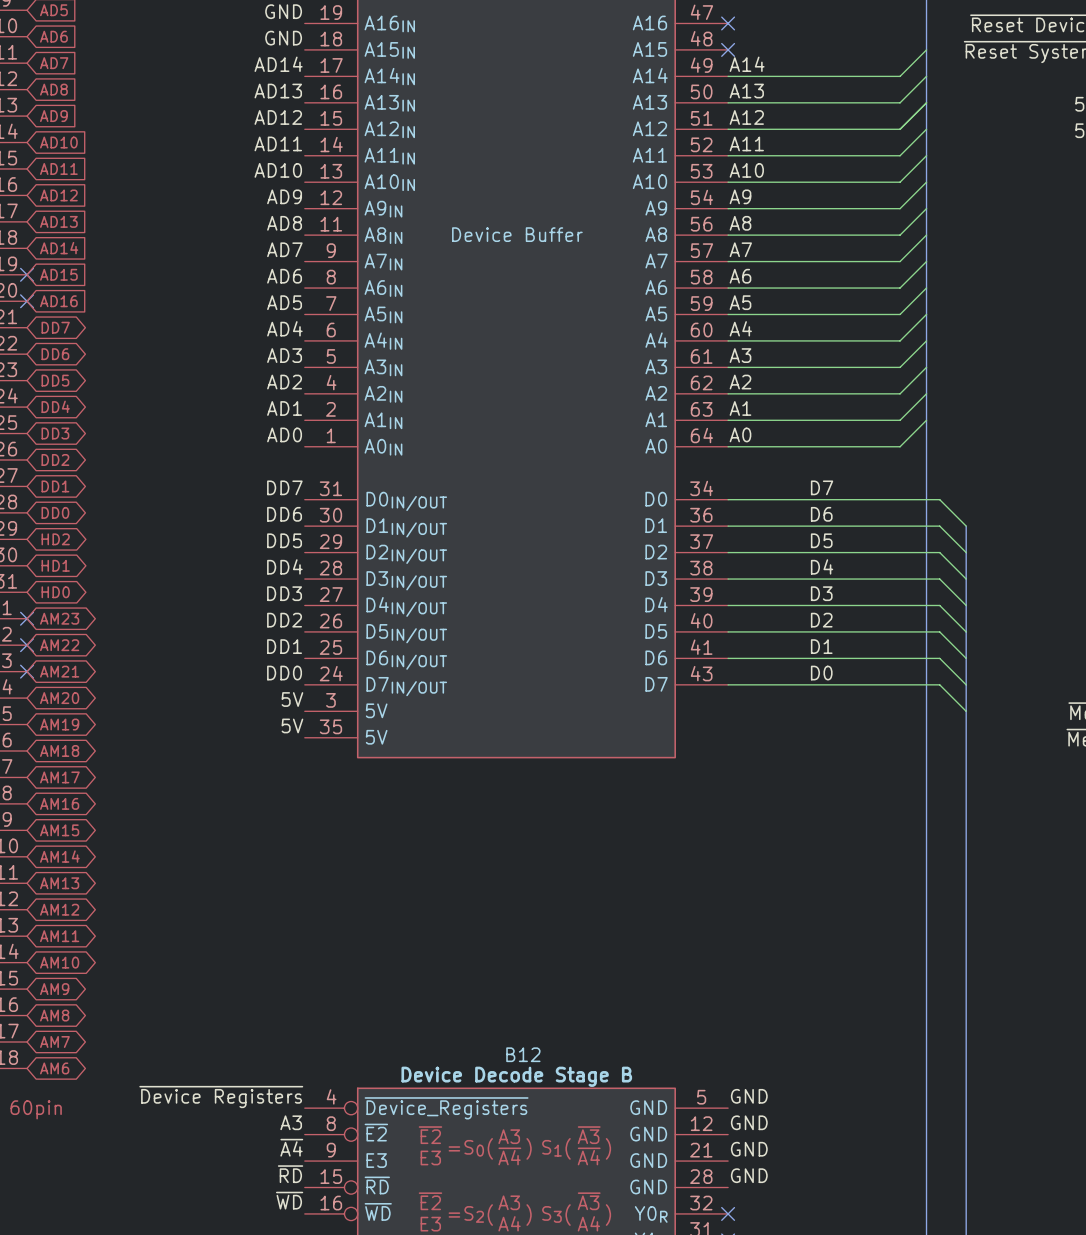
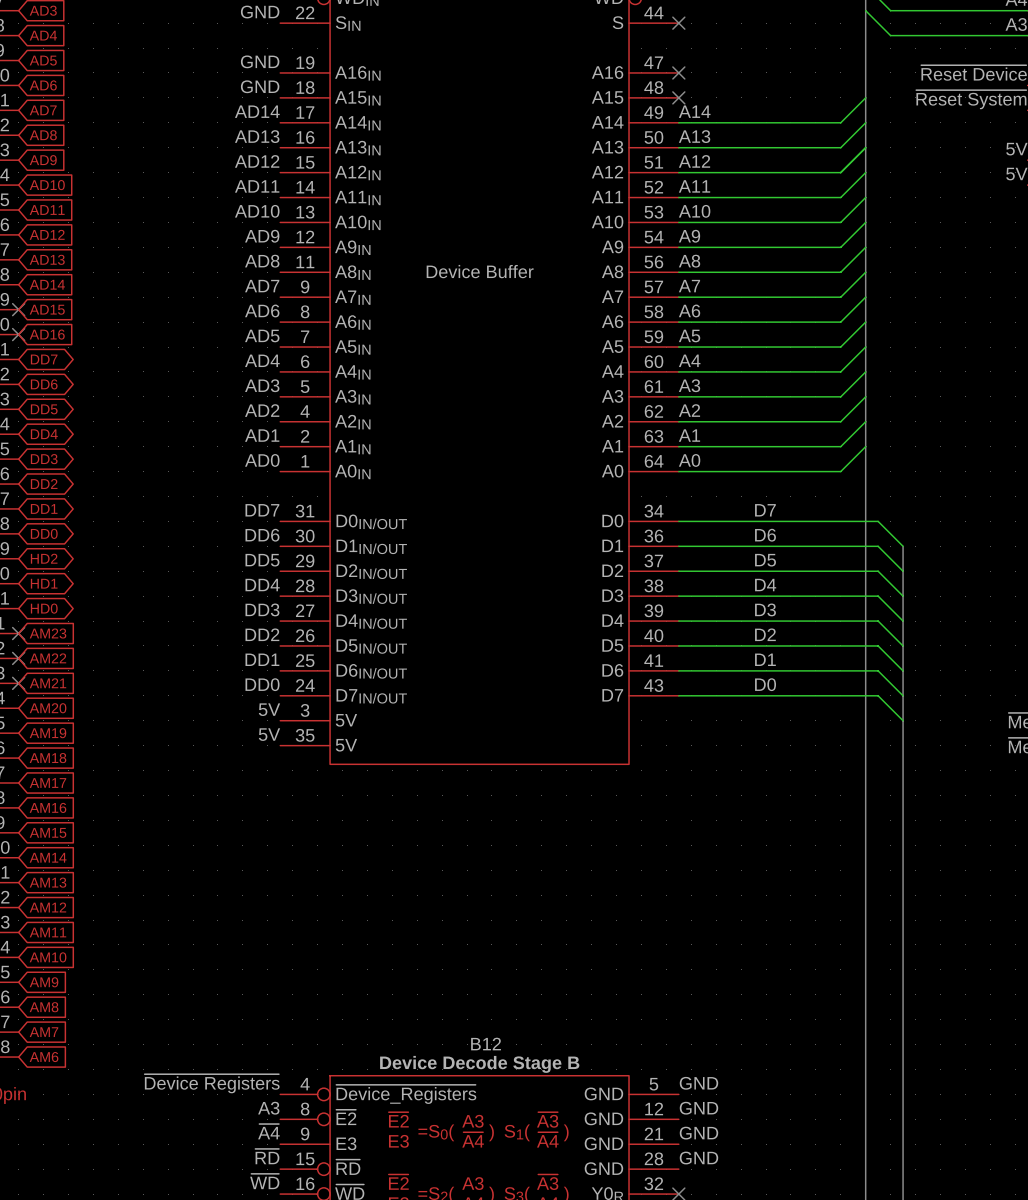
global label shape: bidirectional (59, 618) -> input (48, 633)
global label shape: bidirectional (59, 645) -> input (47, 658)
global label shape: bidirectional (59, 671) -> input (47, 683)
global label shape: bidirectional (59, 698) -> input (48, 708)
global label shape: bidirectional (59, 724) -> input (47, 733)
global label shape: bidirectional (59, 750) -> input (48, 758)
global label shape: bidirectional (59, 777) -> input (47, 783)
global label shape: bidirectional (59, 803) -> input (48, 807)
global label shape: bidirectional (59, 830) -> input (48, 832)
global label shape: bidirectional (59, 856) -> input (48, 857)
global label shape: bidirectional (59, 883) -> input (48, 882)
global label shape: bidirectional (59, 909) -> input (47, 907)
global label shape: bidirectional (59, 936) -> input (47, 932)
global label shape: bidirectional (59, 962) -> input (48, 957)
global label shape: bidirectional (54, 989) -> input (44, 982)
global label shape: bidirectional (54, 1015) -> input (44, 1007)
global label shape: bidirectional (54, 1042) -> input (43, 1032)
global label shape: bidirectional (54, 1068) -> input (44, 1057)

